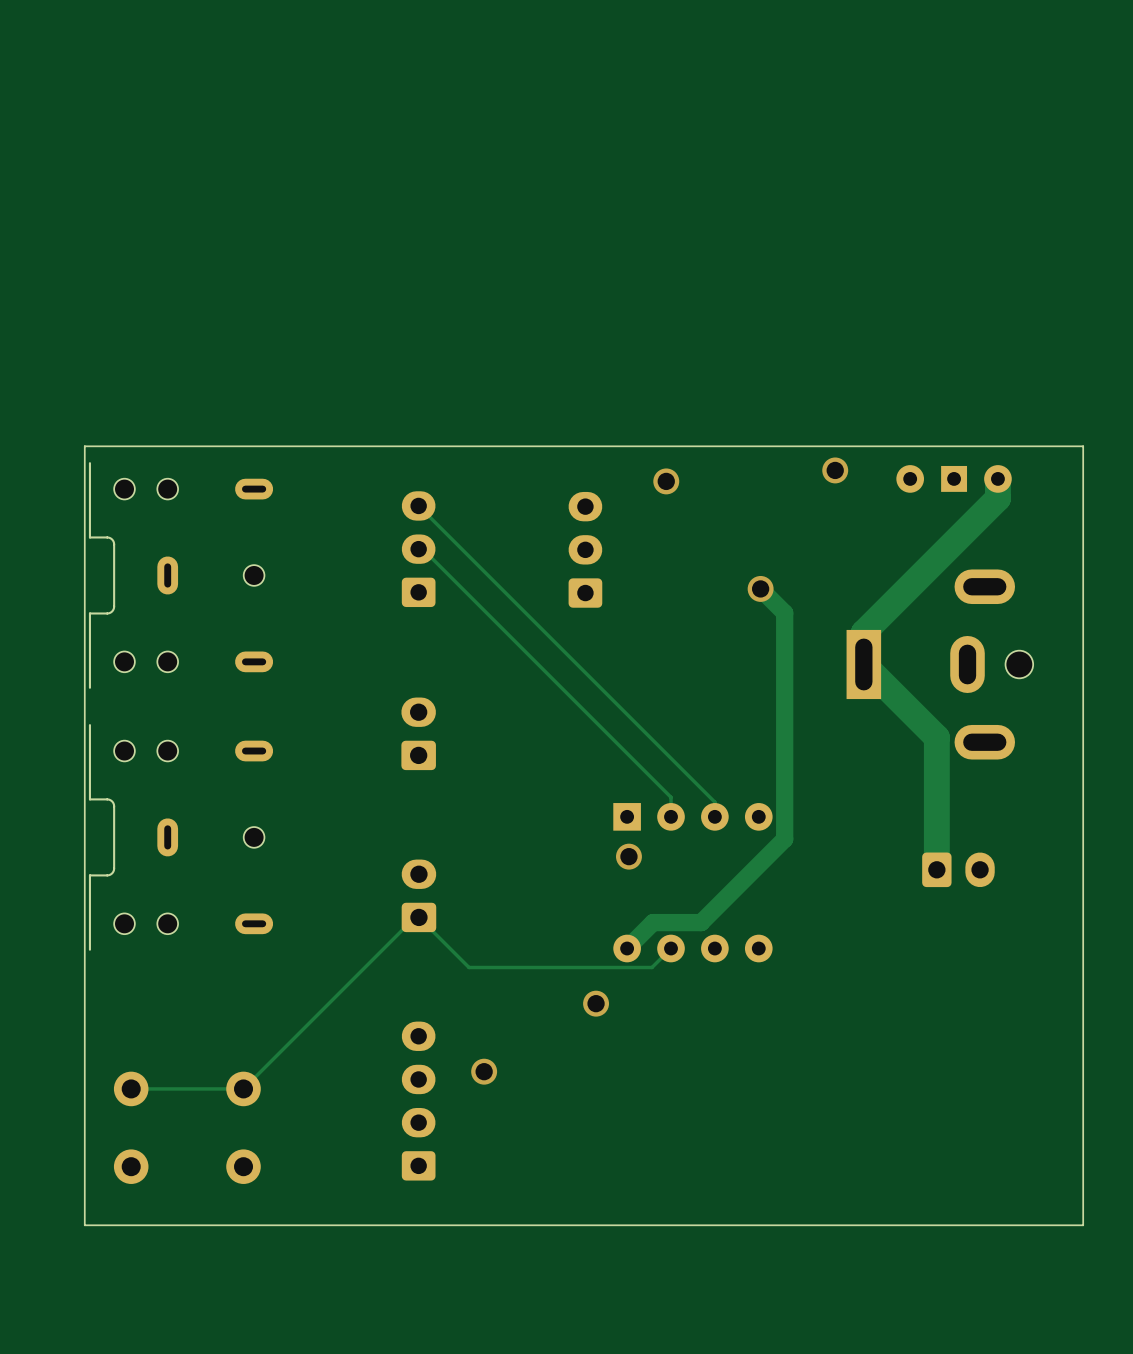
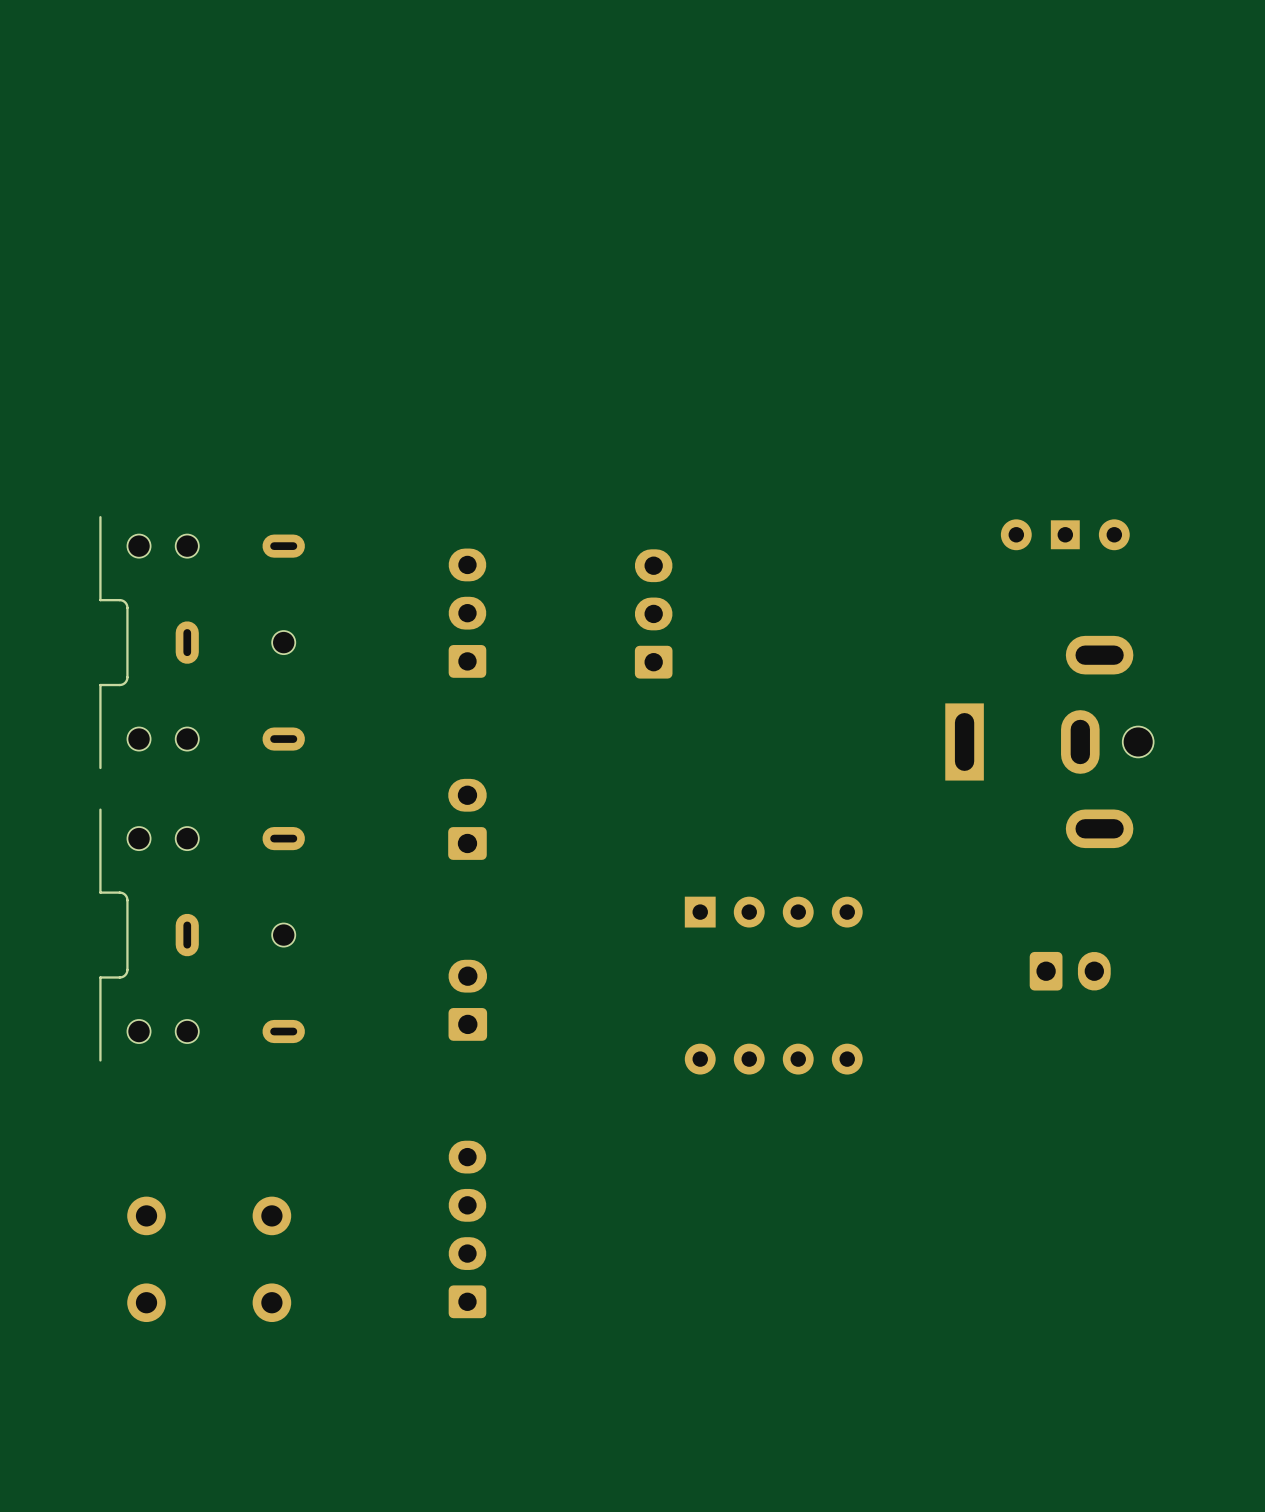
board edge: (1083, 446) (84, 446) (84, 1225) (1083, 1225) (1083, 446) -> none
via: (835, 470) -> none
track: (997, 478) (997, 498) (863, 632) (863, 664) (936, 737) (936, 869) -> none
via: (666, 481) -> none
track: (418, 505) (714, 802) (714, 816) -> none
track: (418, 549) (422, 549) (671, 797) (671, 816) -> none
track: (760, 588) (784, 613) (784, 839) (701, 922) (653, 922) (627, 948) -> none
via: (760, 588) -> none
via: (628, 856) -> none
track: (671, 948) (651, 967) (469, 967) (418, 917) (415, 917) (243, 1088) (131, 1088) -> none
via: (596, 1003) -> none
via: (484, 1071) -> none

